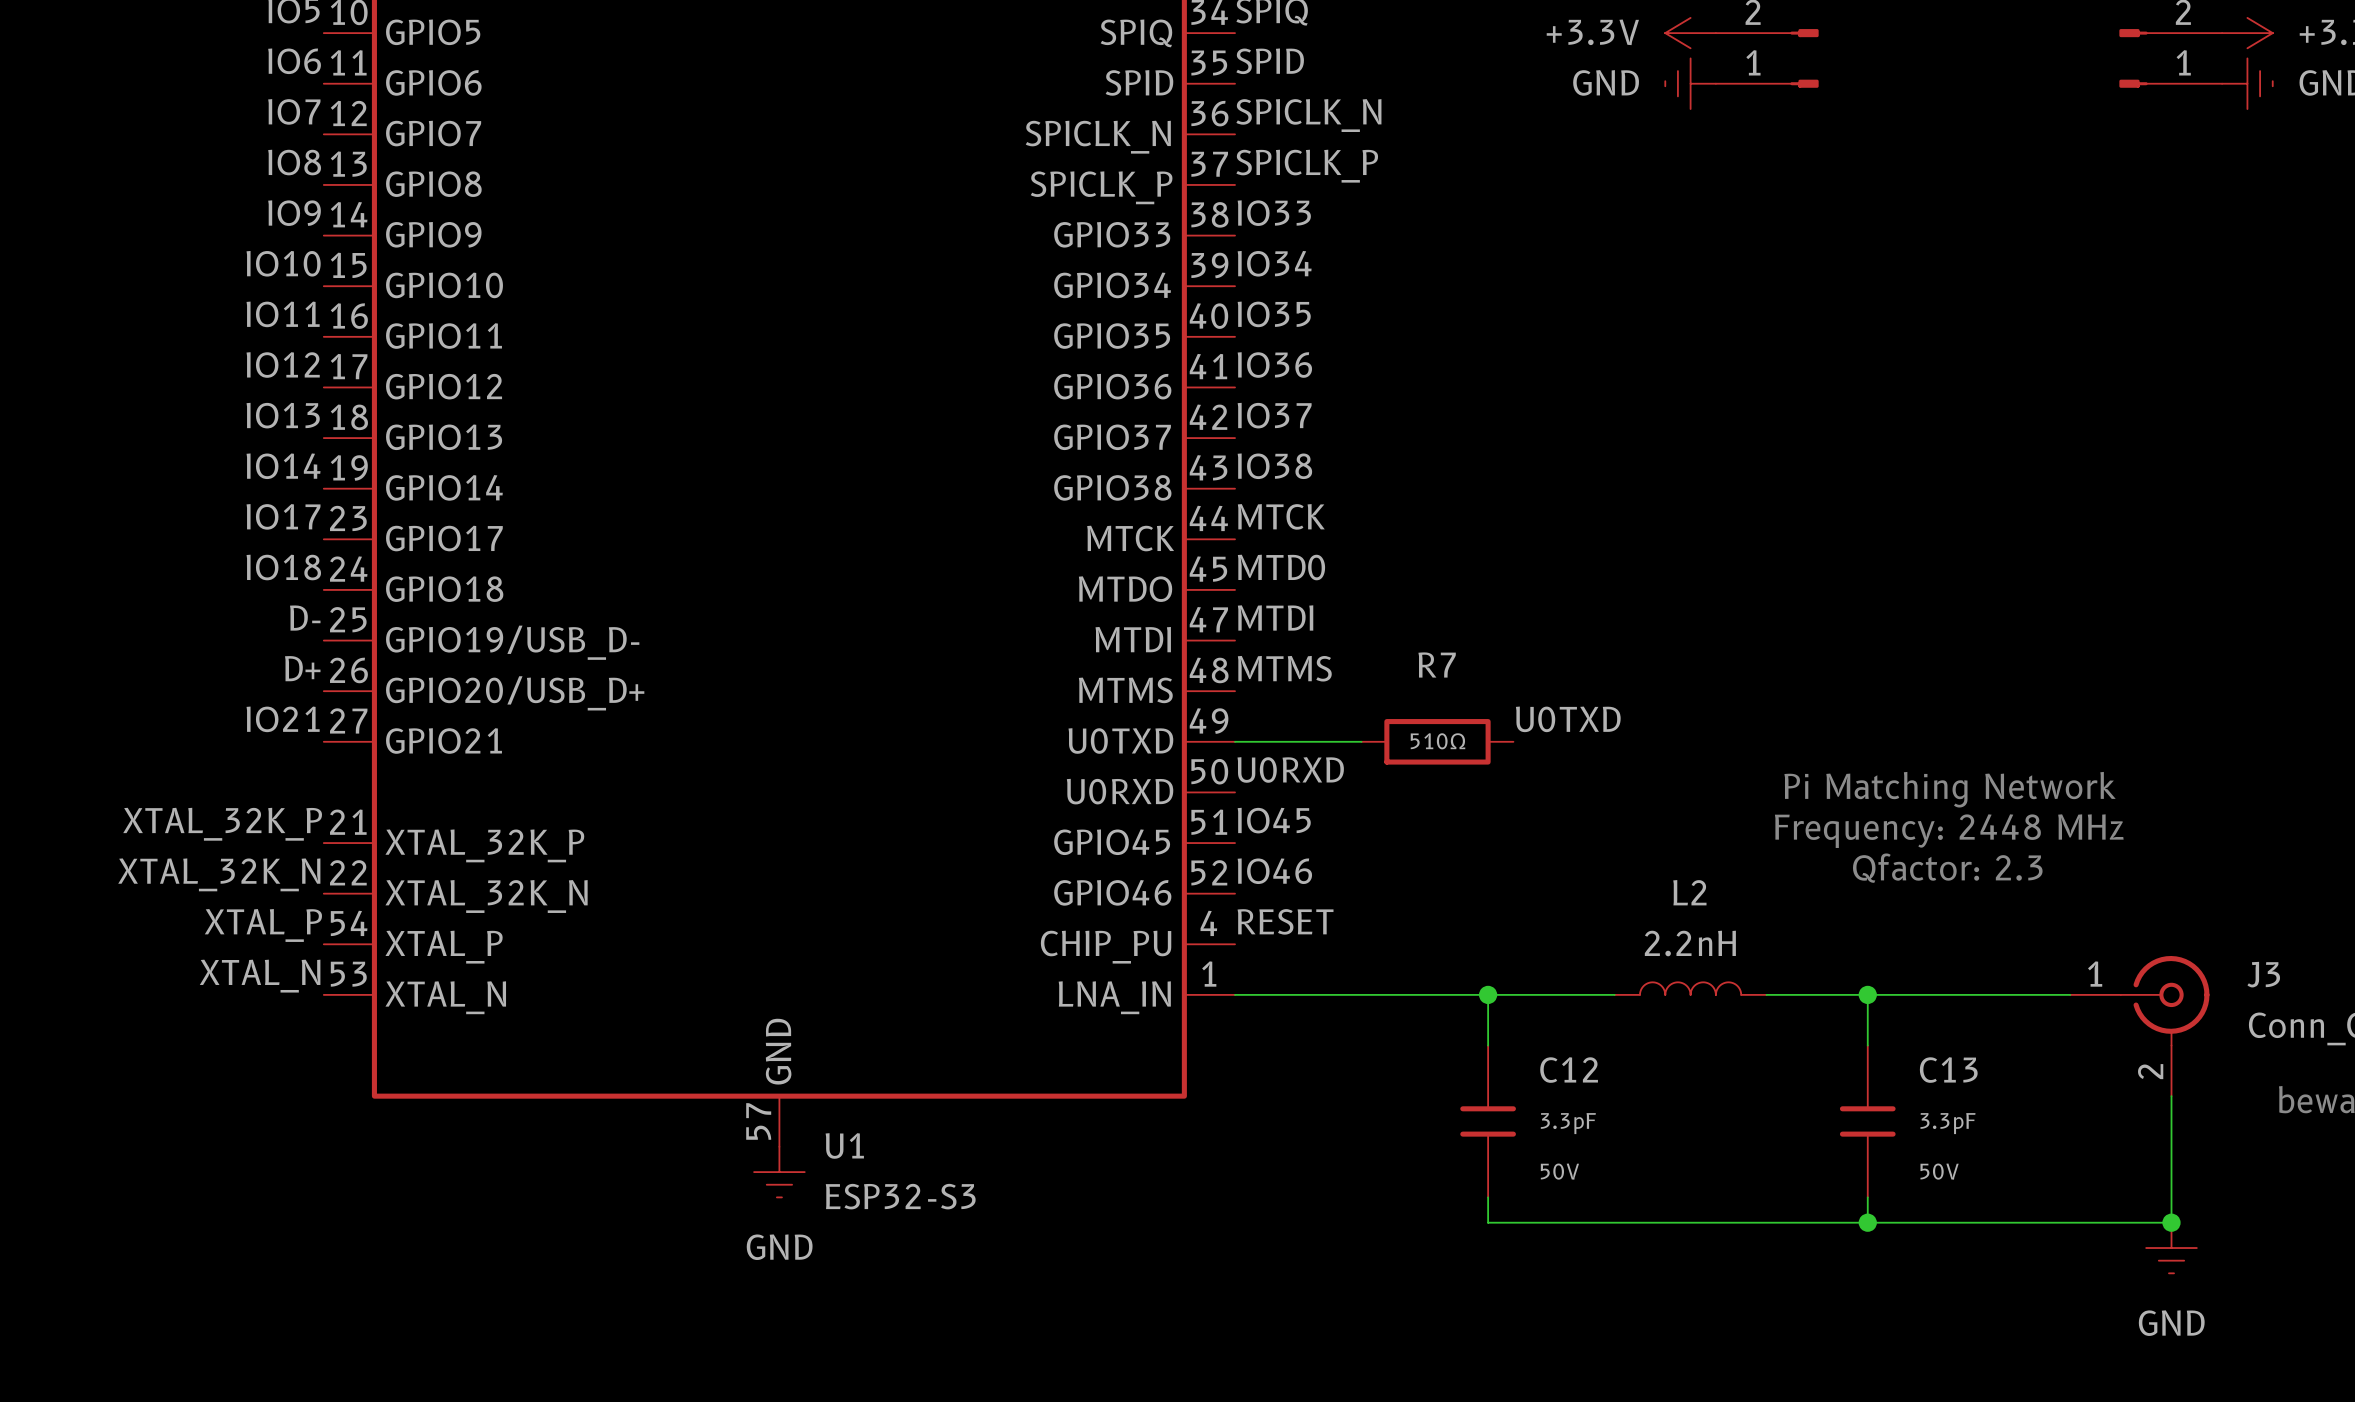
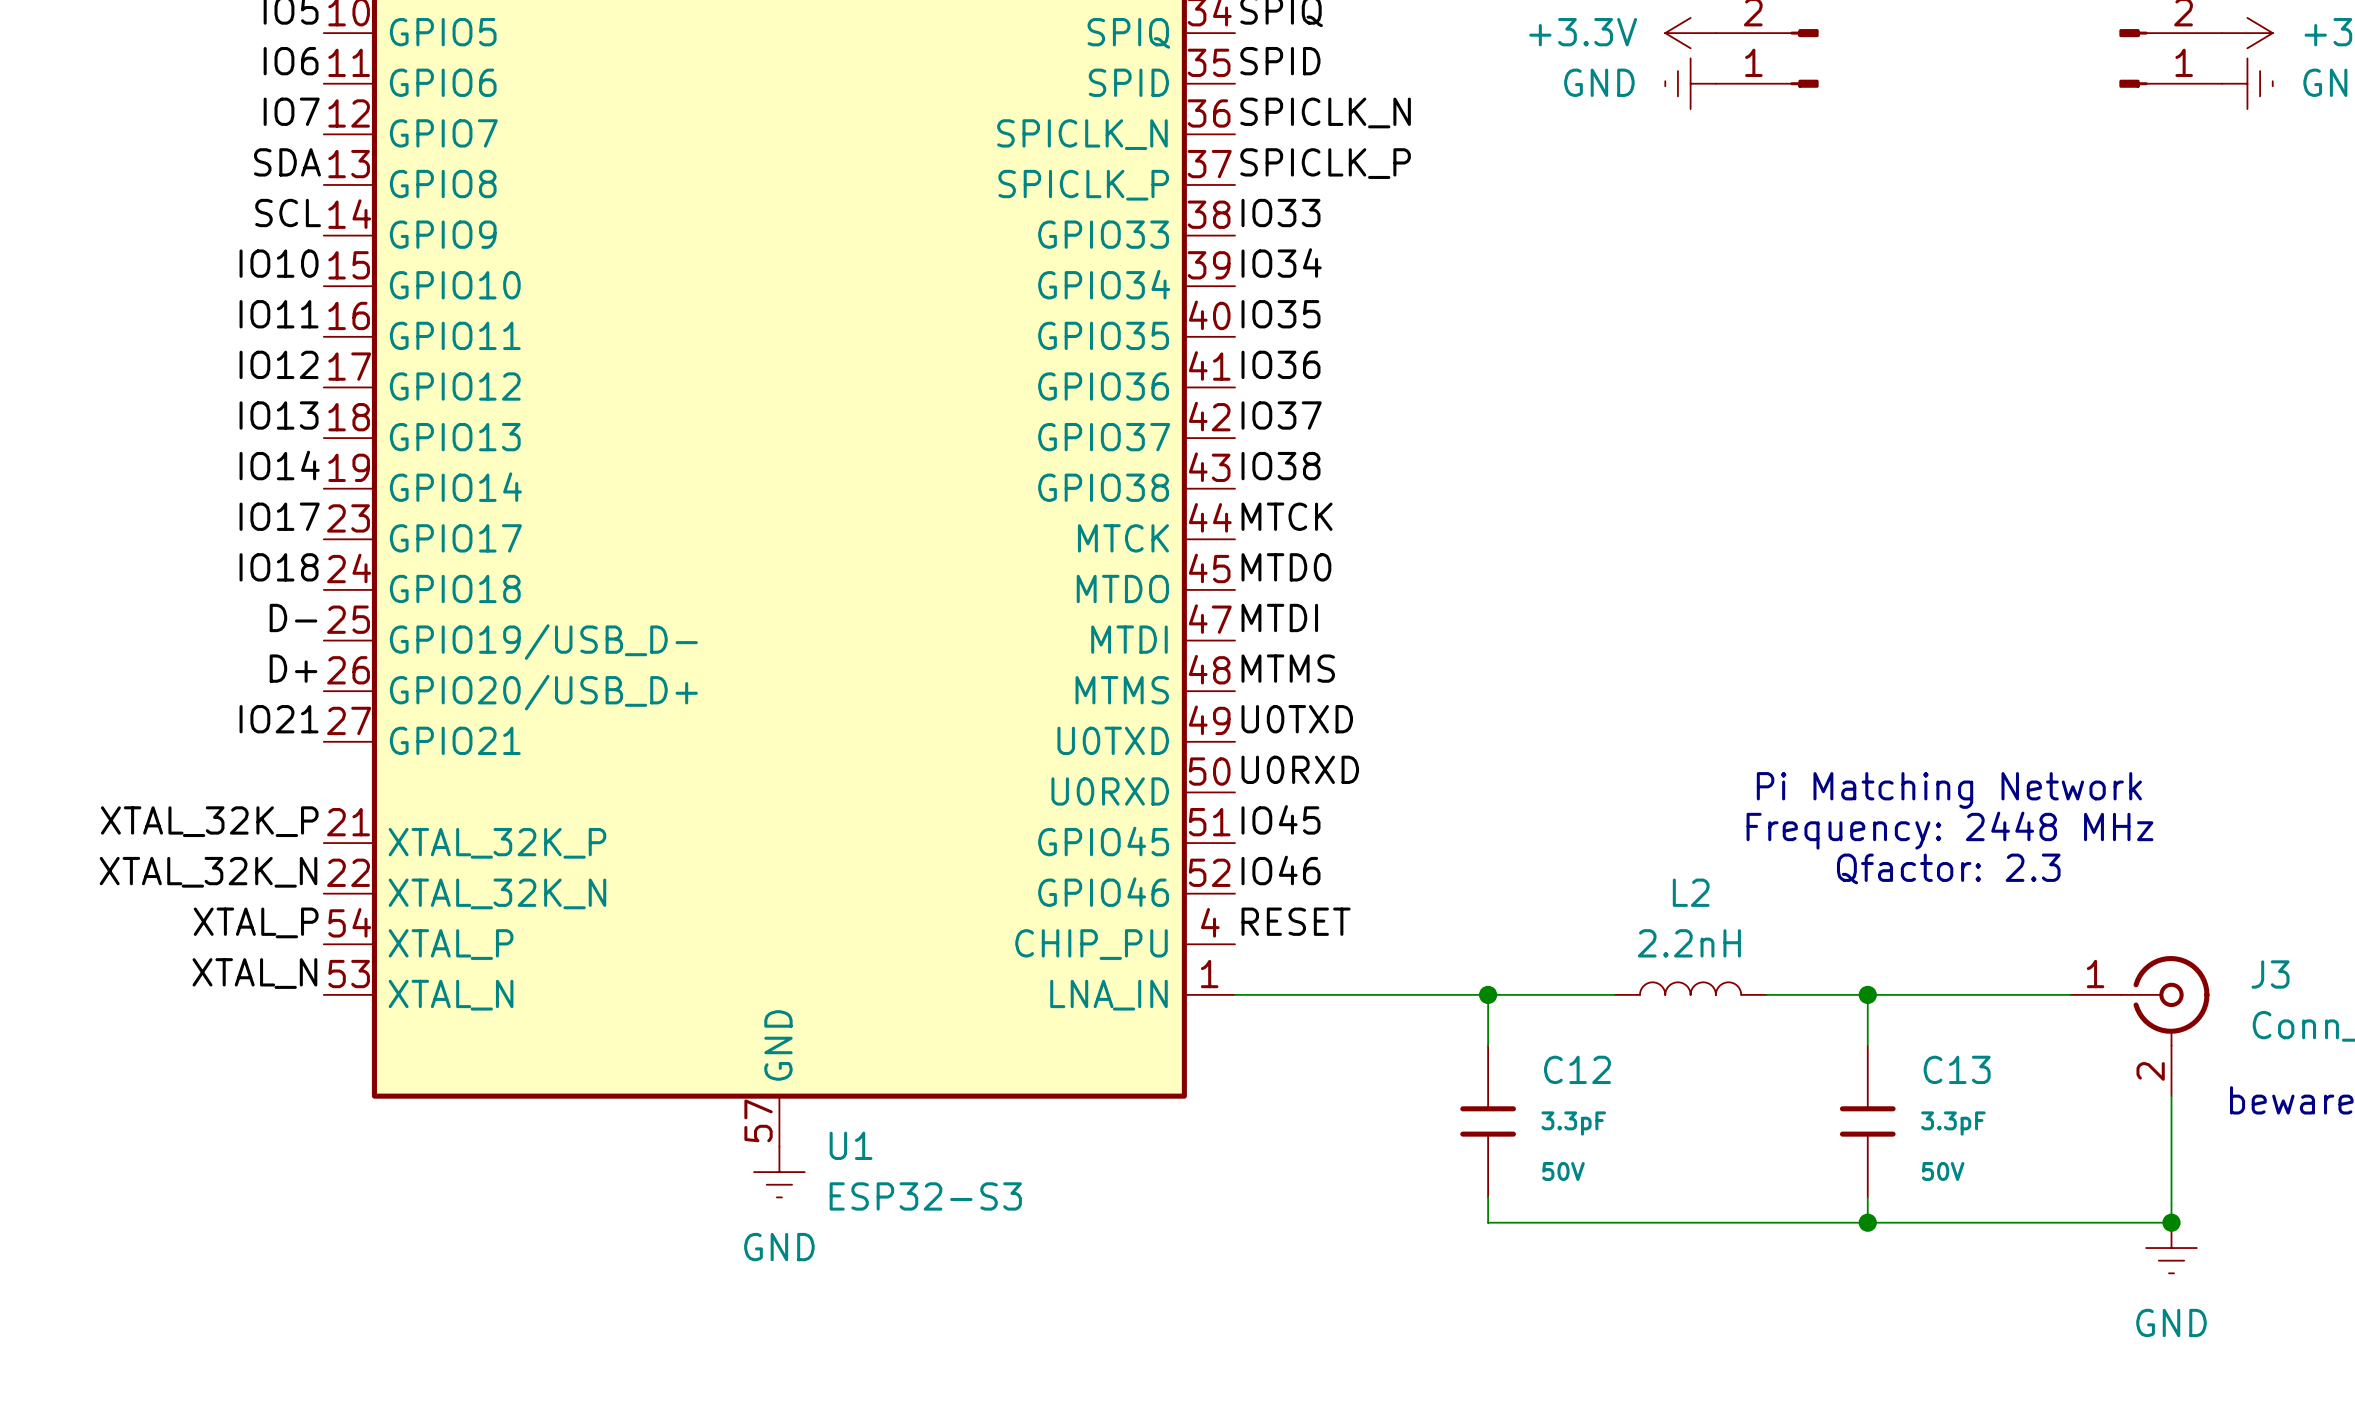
label: IO8 (294, 162) -> SDA (287, 162)
label: IO9 (294, 213) -> SCL (288, 213)
label position: U0TXD (1568, 719) -> U0TXD (1297, 719)
wire: (1235, 741) (1361, 741) -> none
R7: 510Ω (1437, 741) -> none

